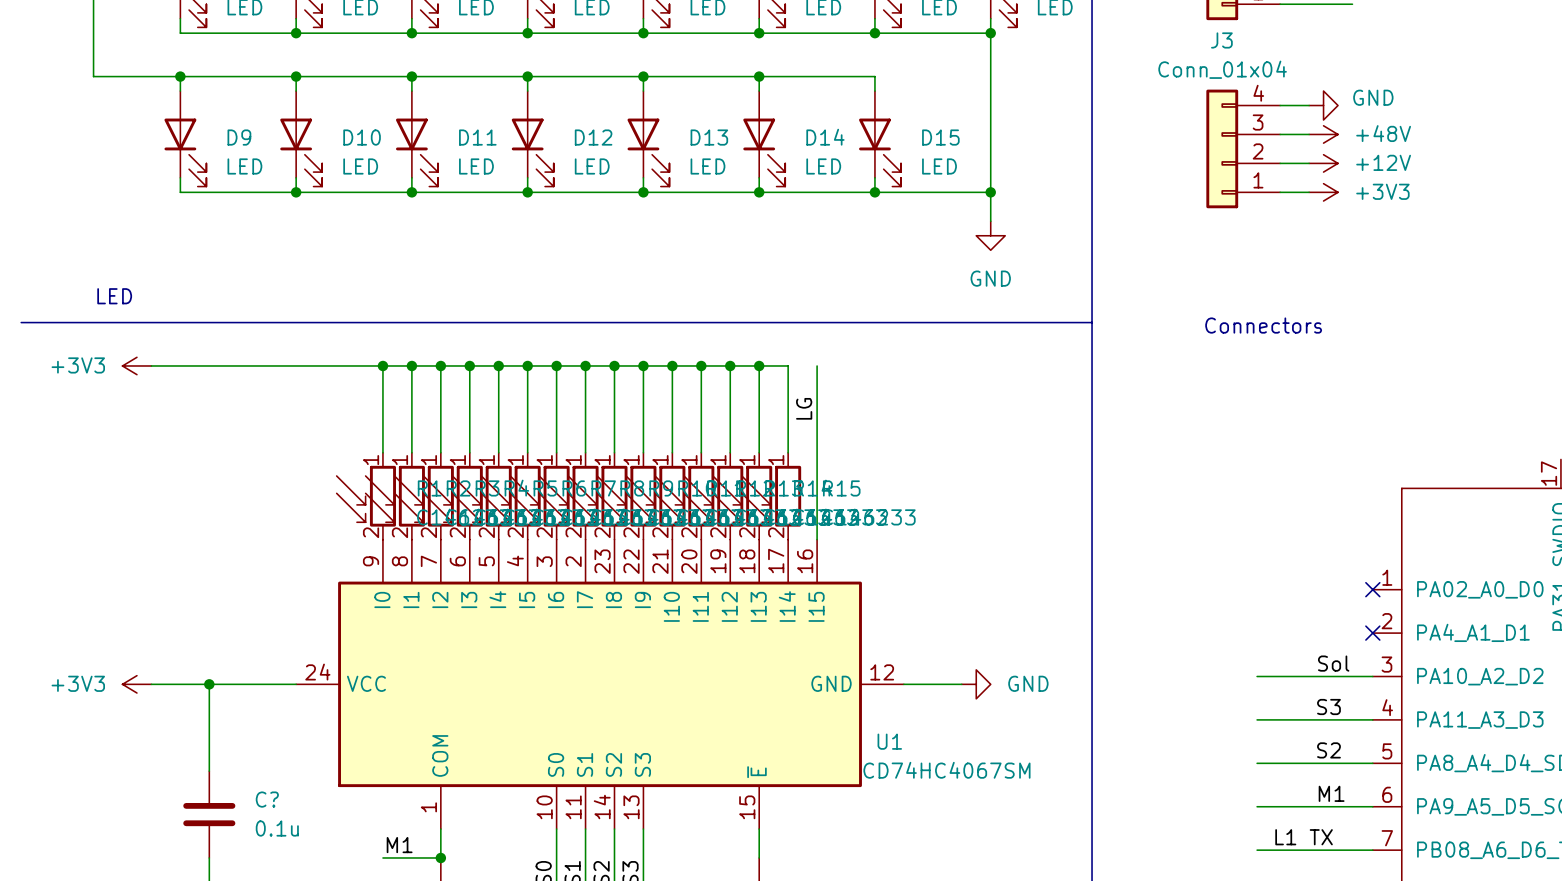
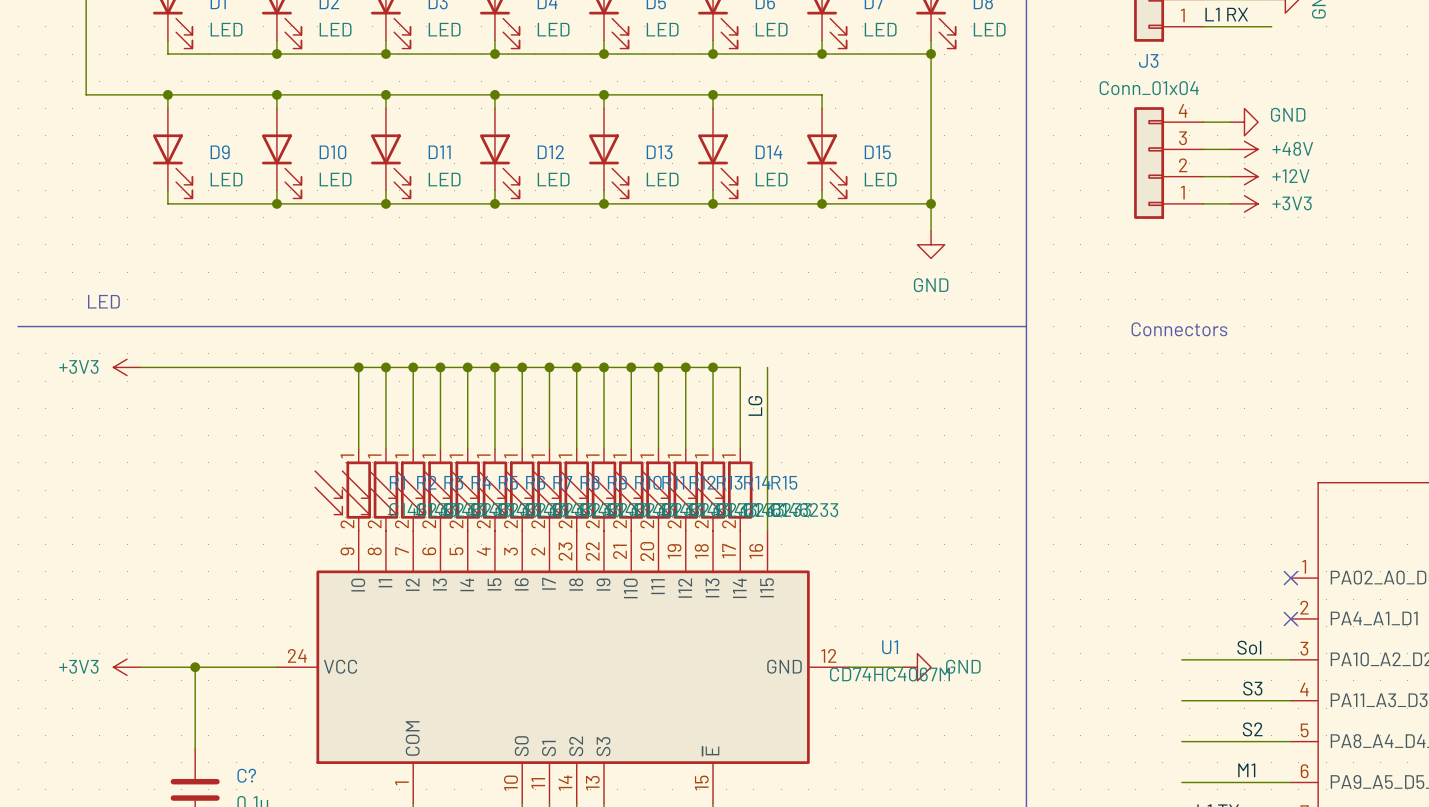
U1 name position: U1 (889, 741) -> U1 (890, 647)
U1 value: CD74HC4067SM (946, 770) -> CD74HC4067M (889, 674)

